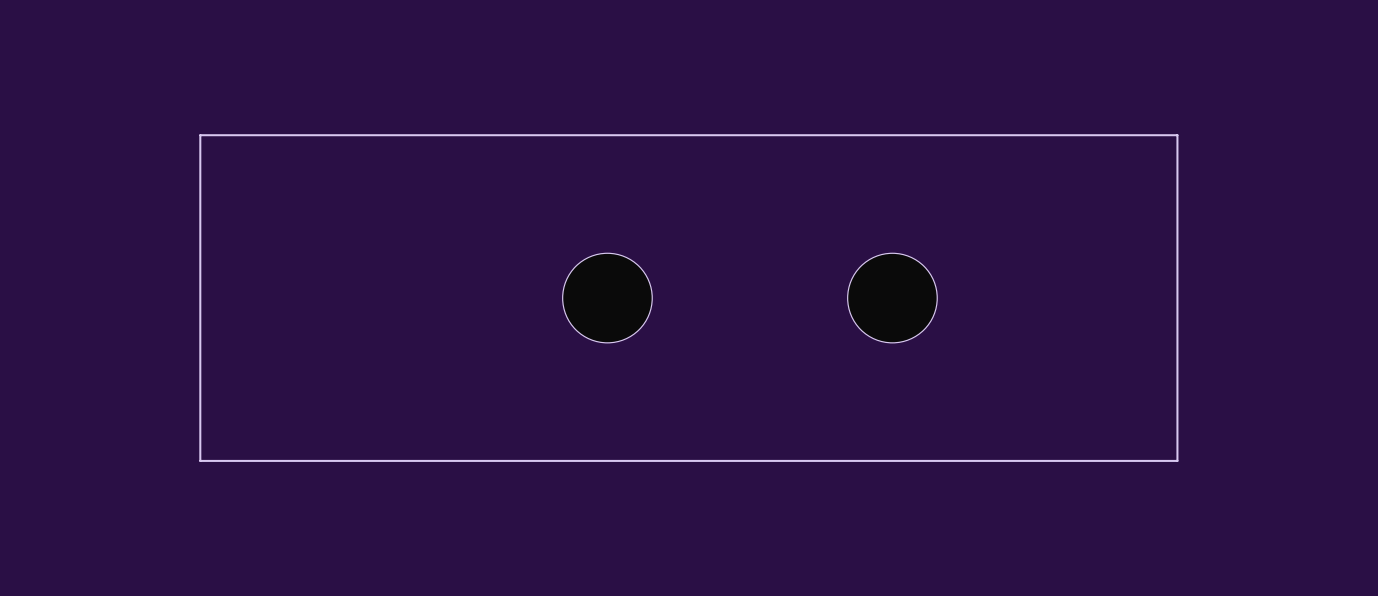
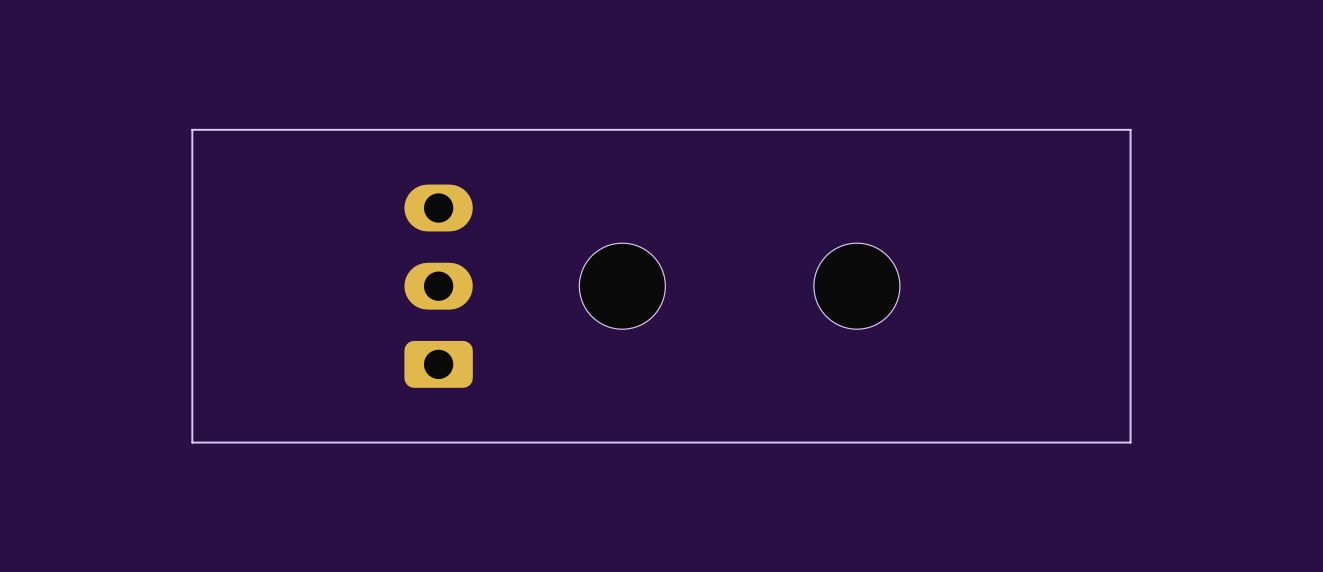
part: none -> (438, 286)
part position: (607, 298) -> (622, 286)

